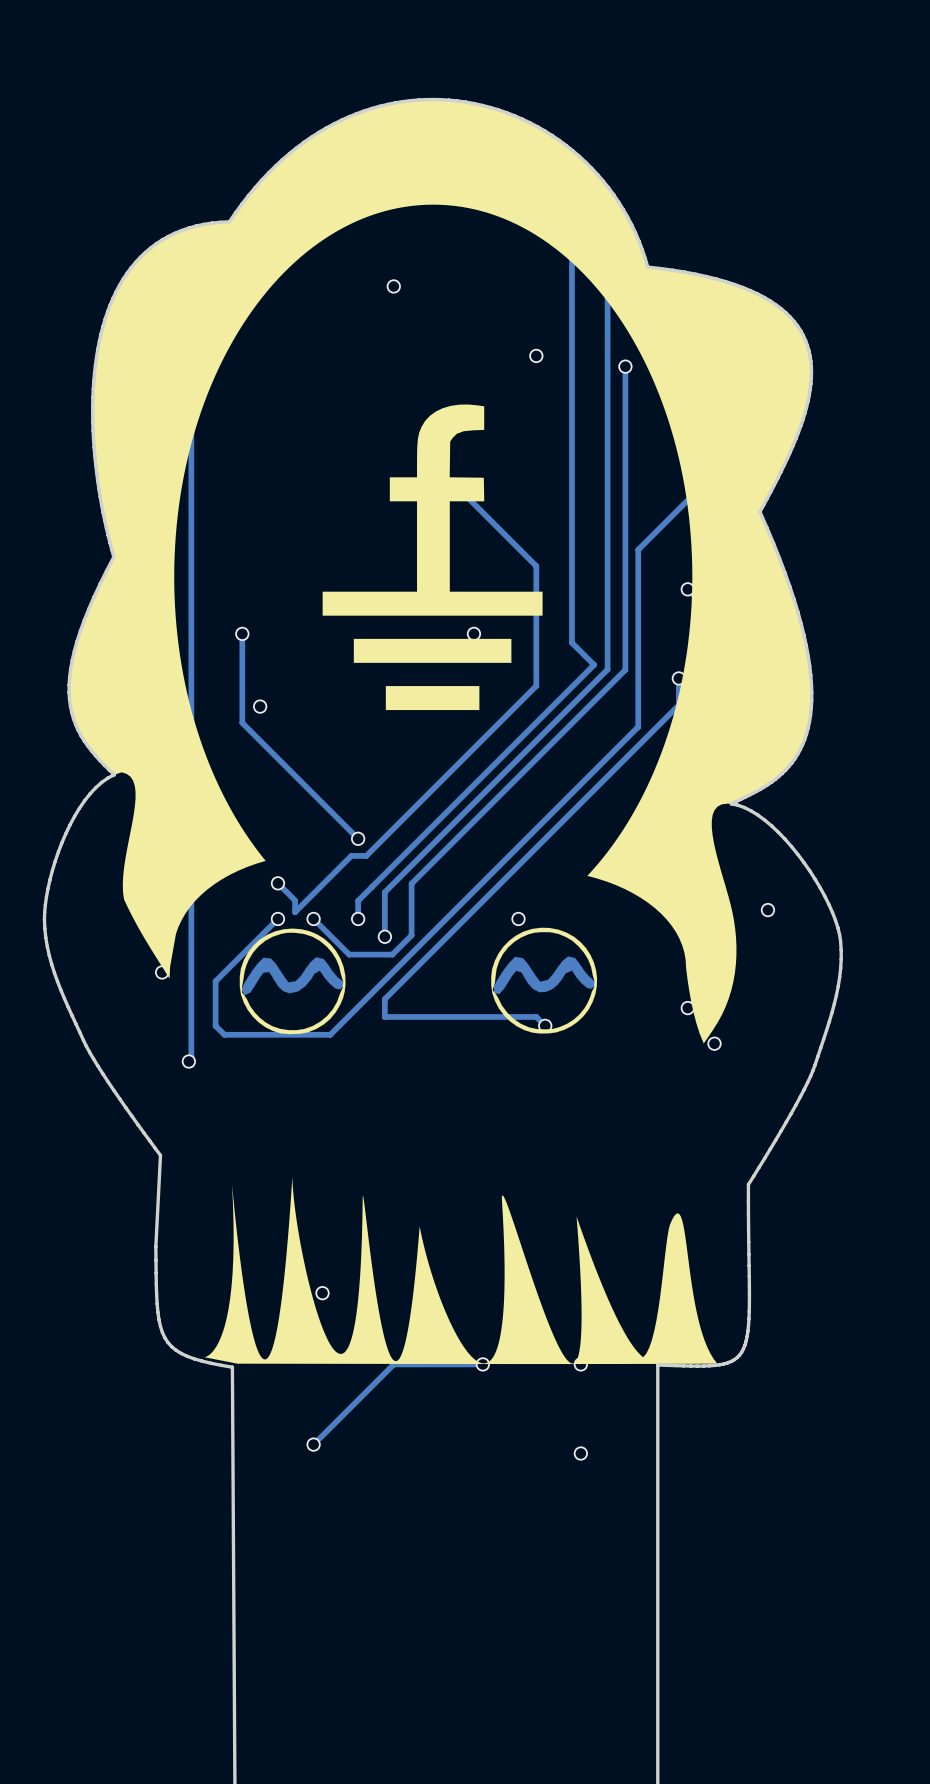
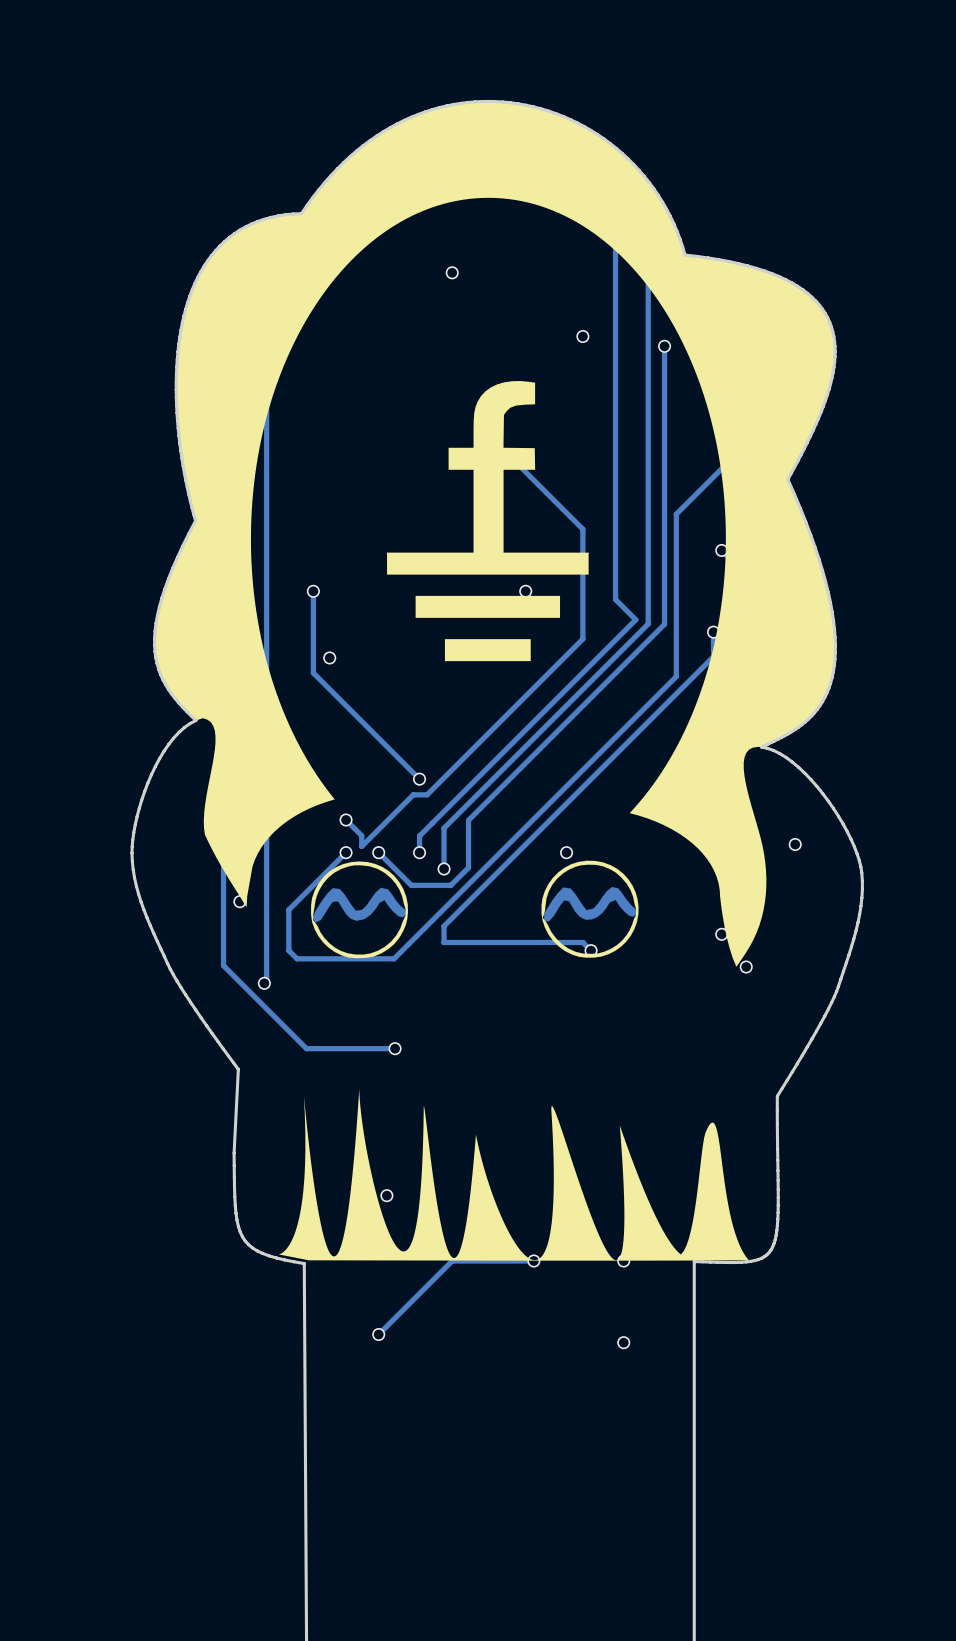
track: none -> (223, 550) (223, 965) (306, 1048) (395, 1048)
via: none -> (395, 1048)

